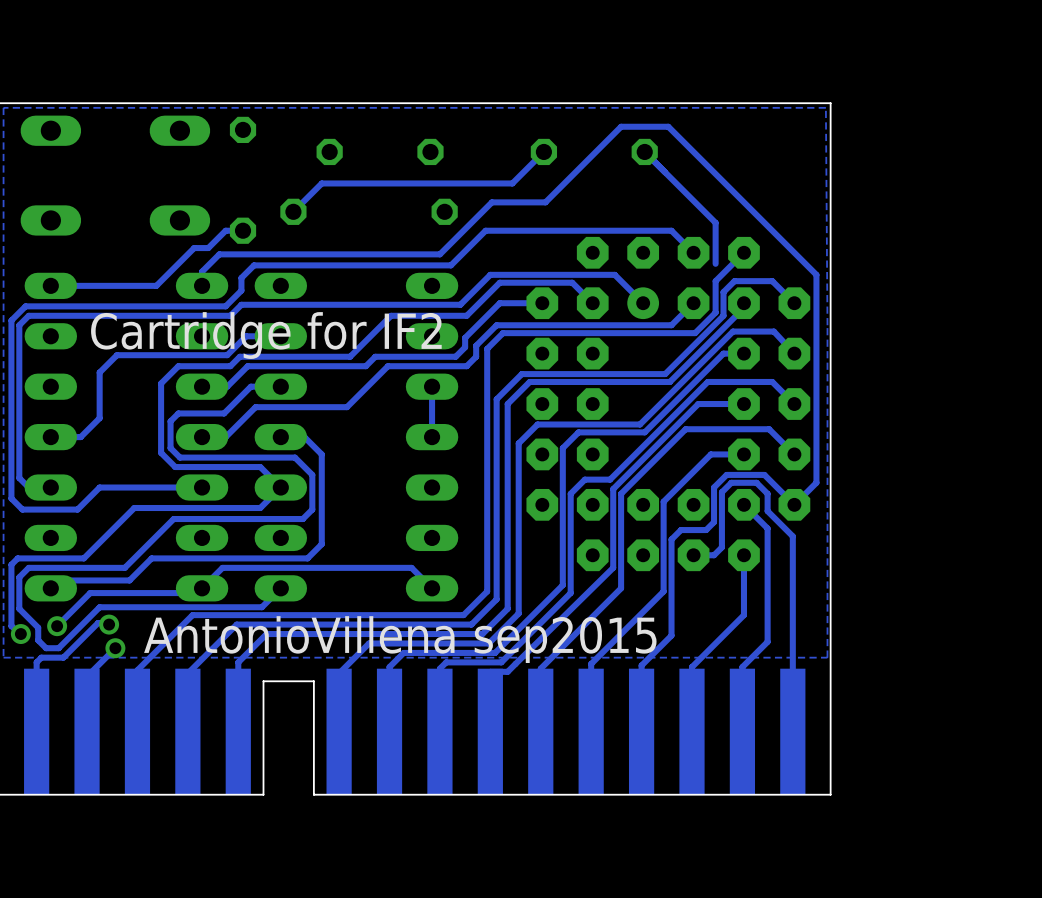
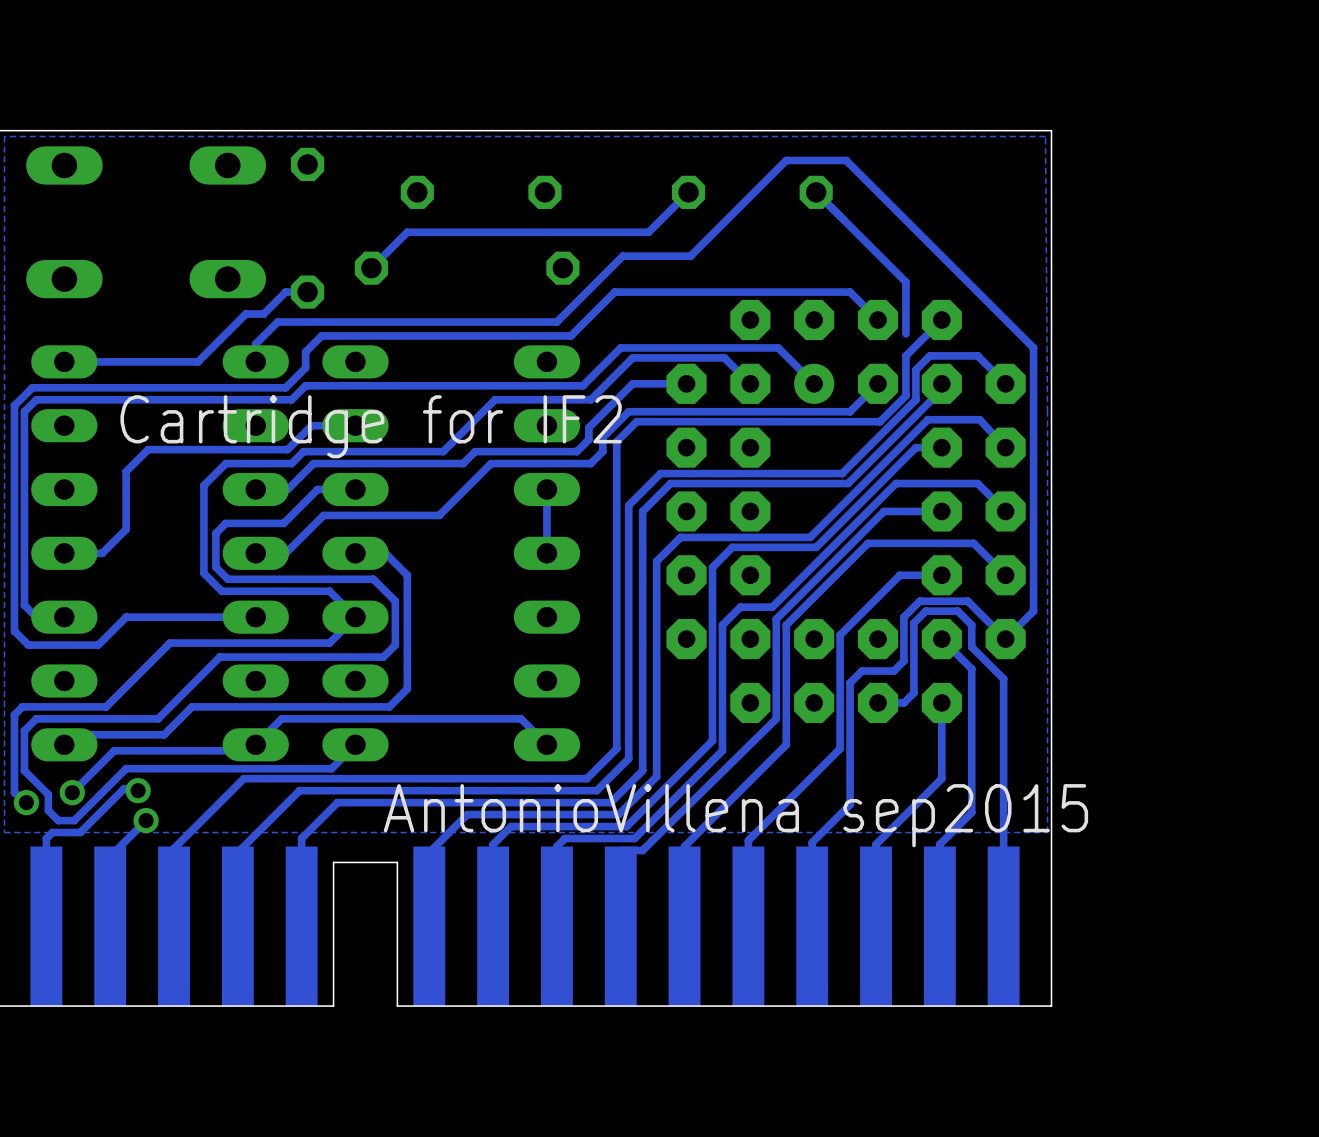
text position: AntonioVillena sep2015 (400, 639) -> AntonioVillena sep2015 (735, 815)

